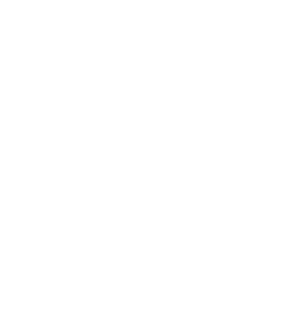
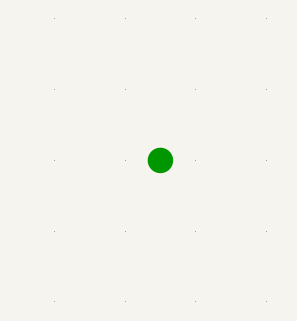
junction: none -> (160, 160)

